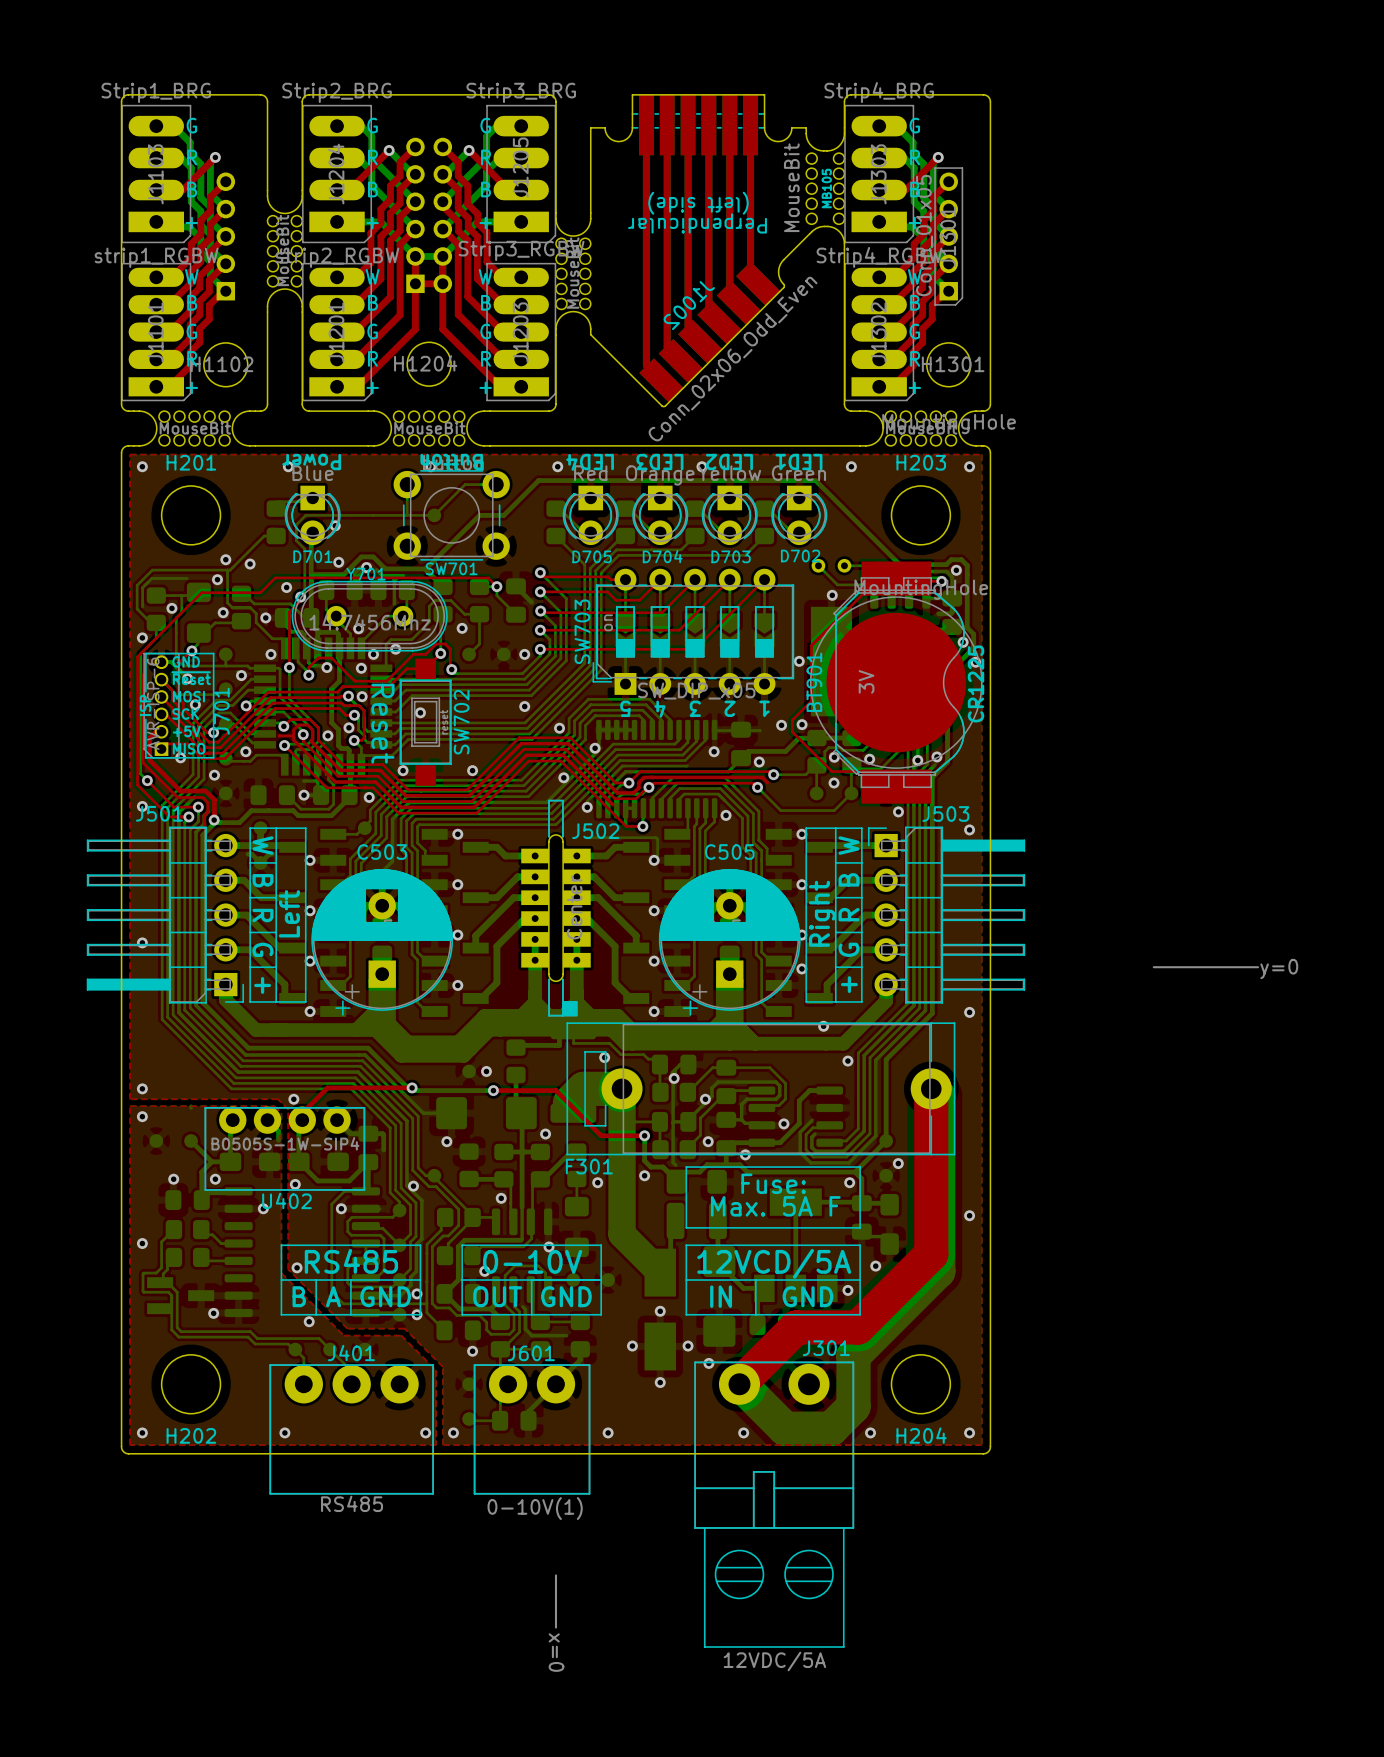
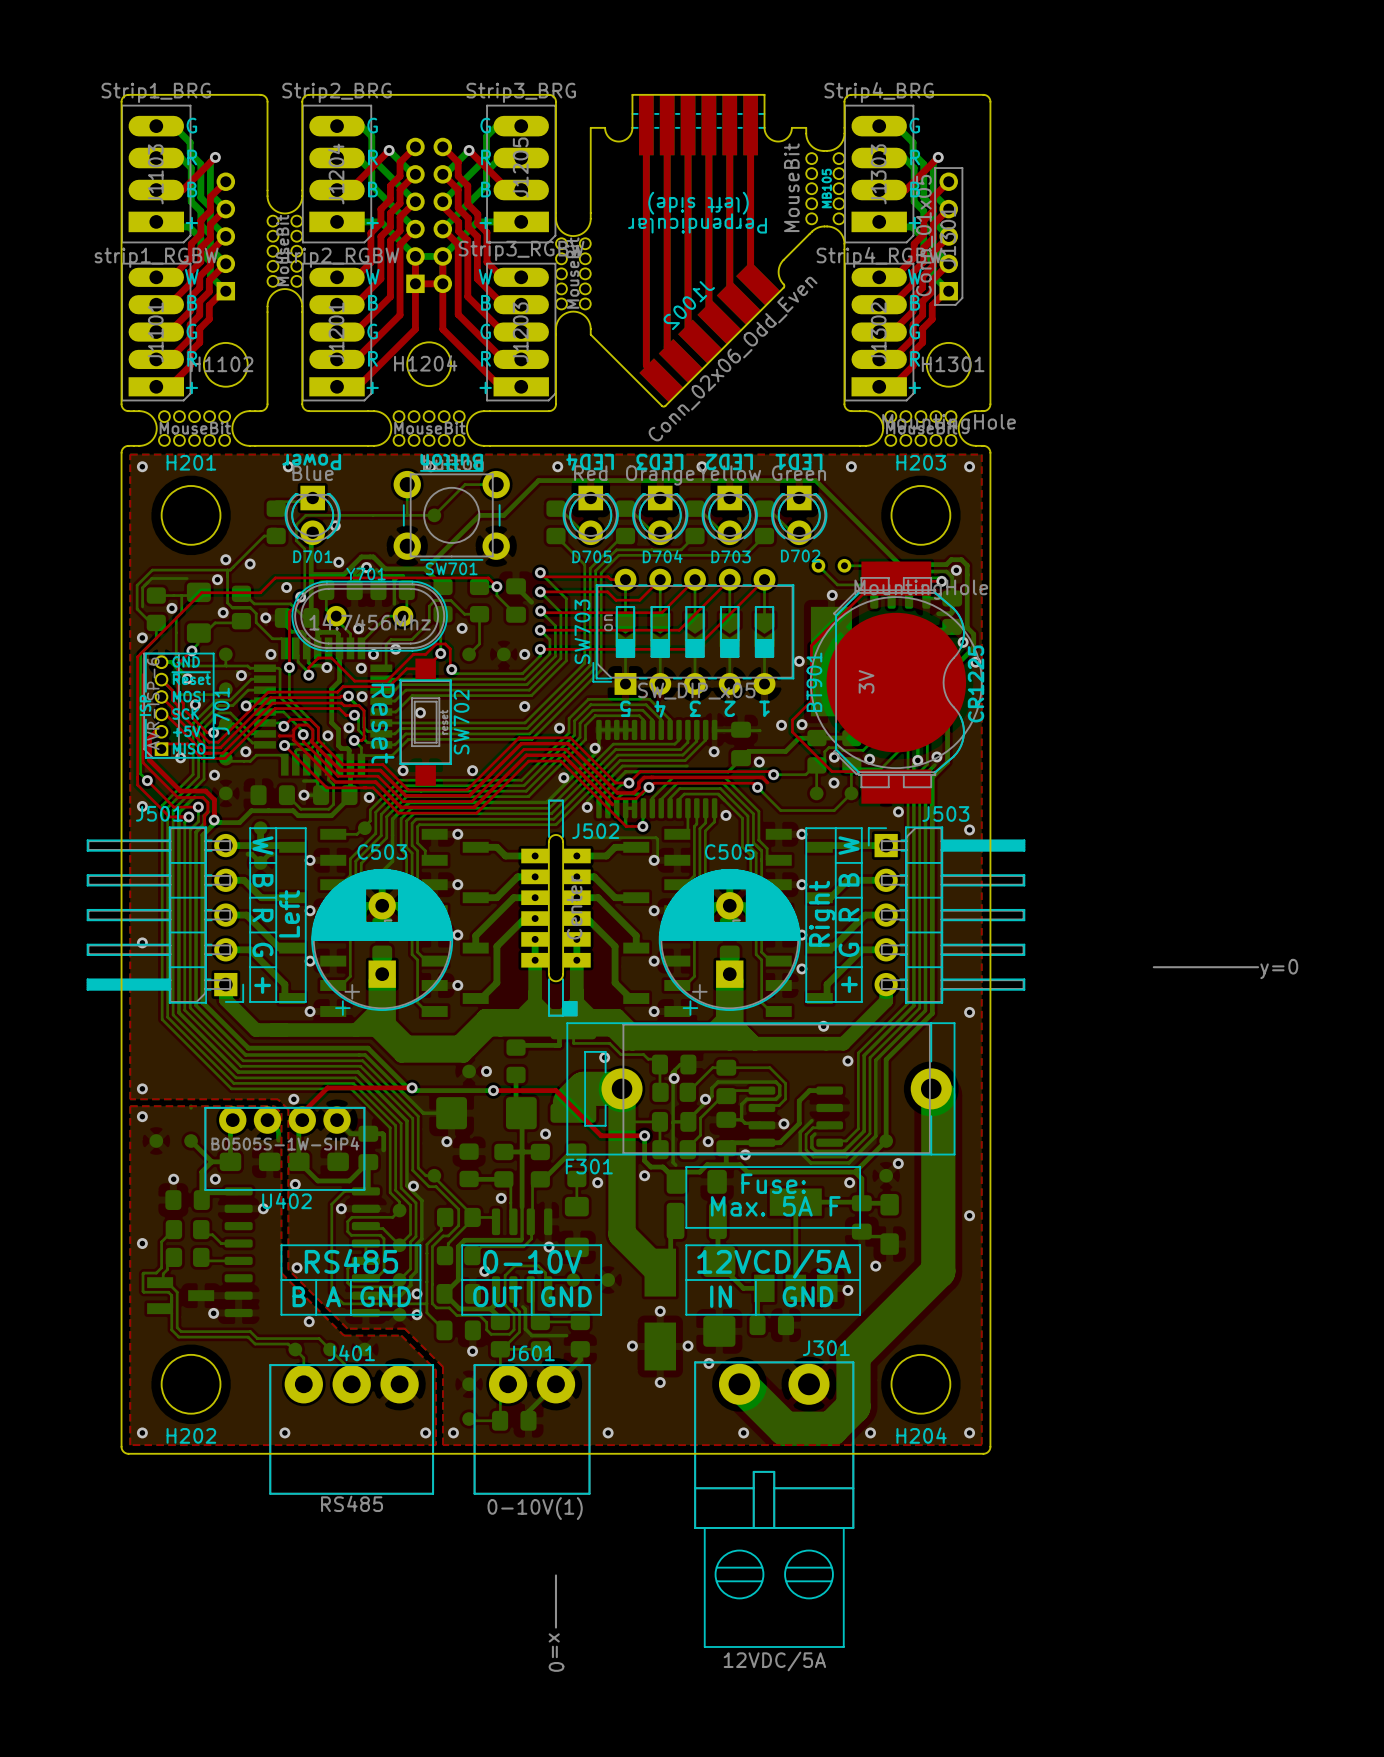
top track: (931, 1088) (931, 1254) (857, 1327) (796, 1327) (739, 1384) -> none

